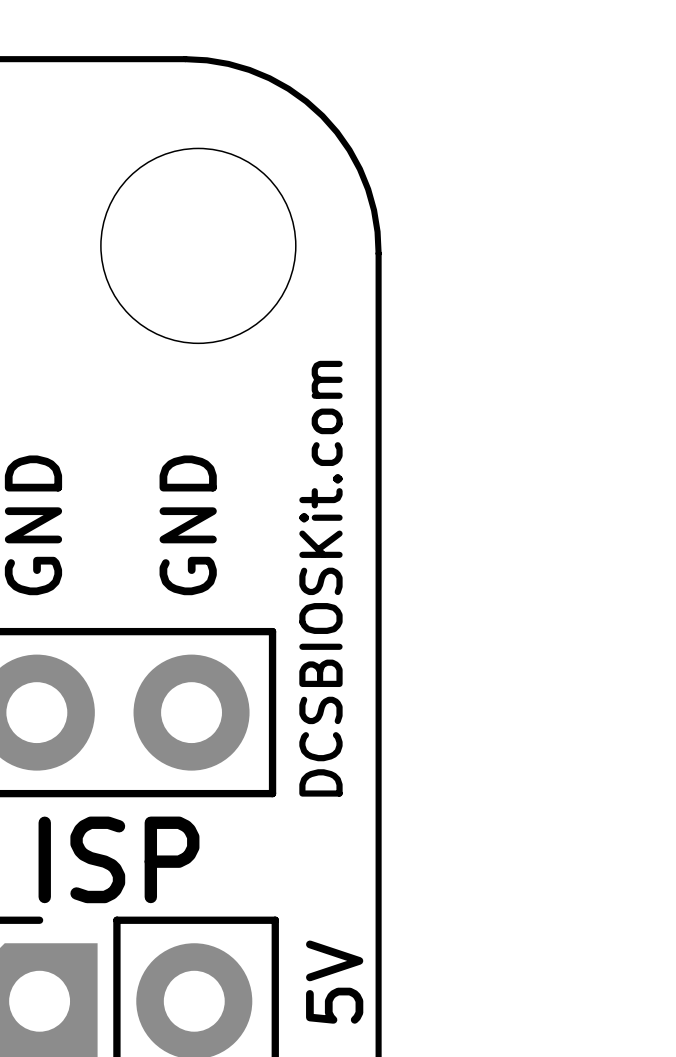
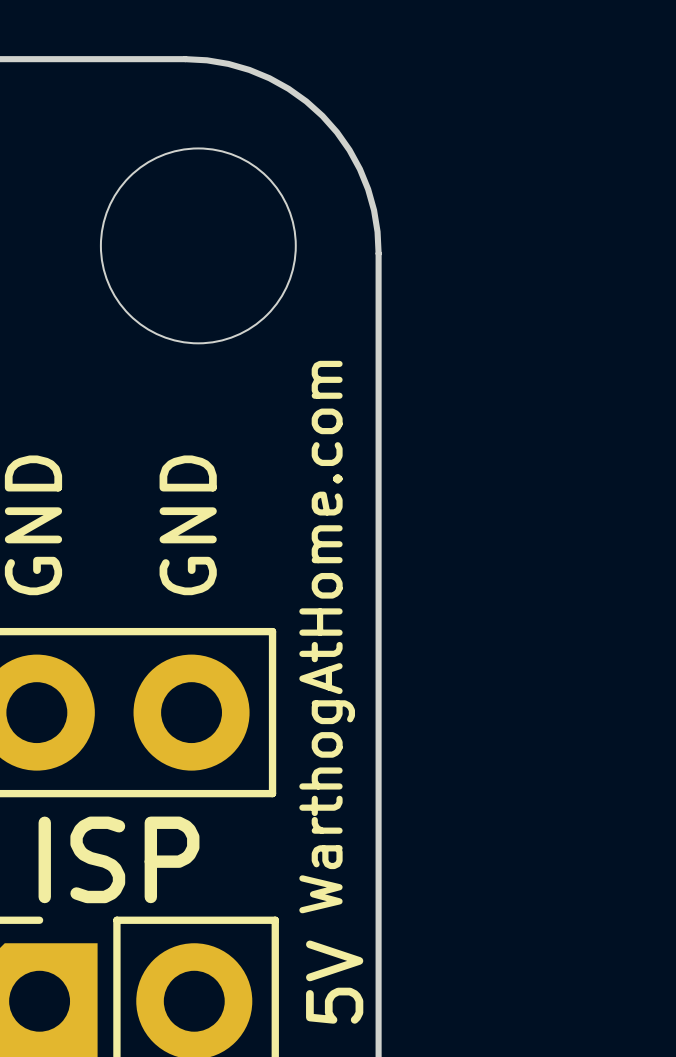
text: DCSBIOSKit.com (320, 578) -> WarthogAtHome.com (327, 637)

